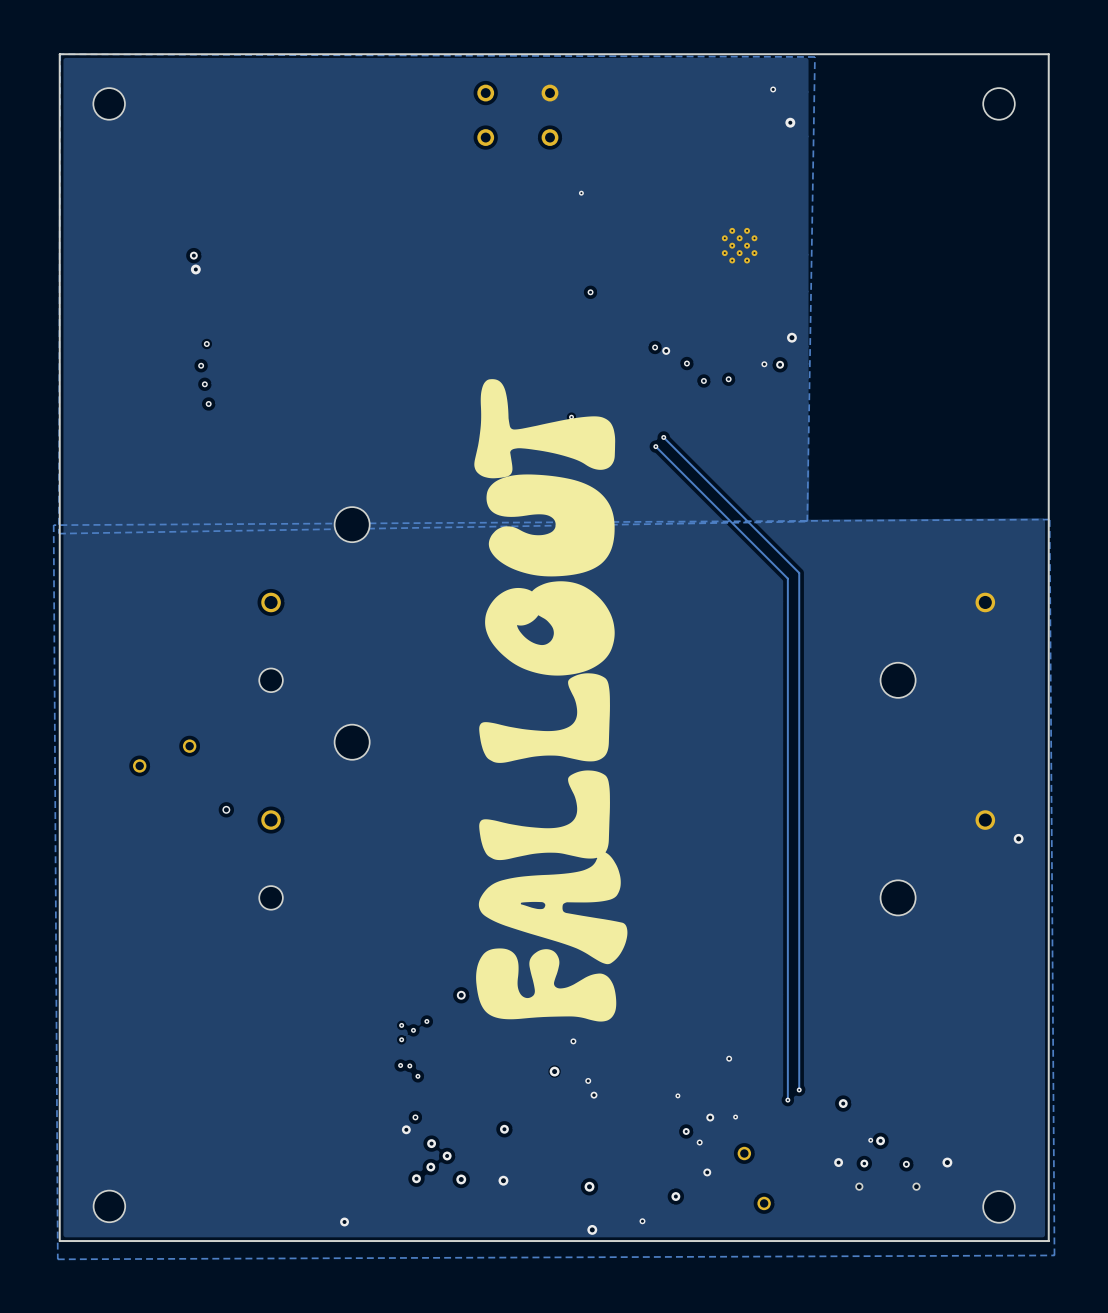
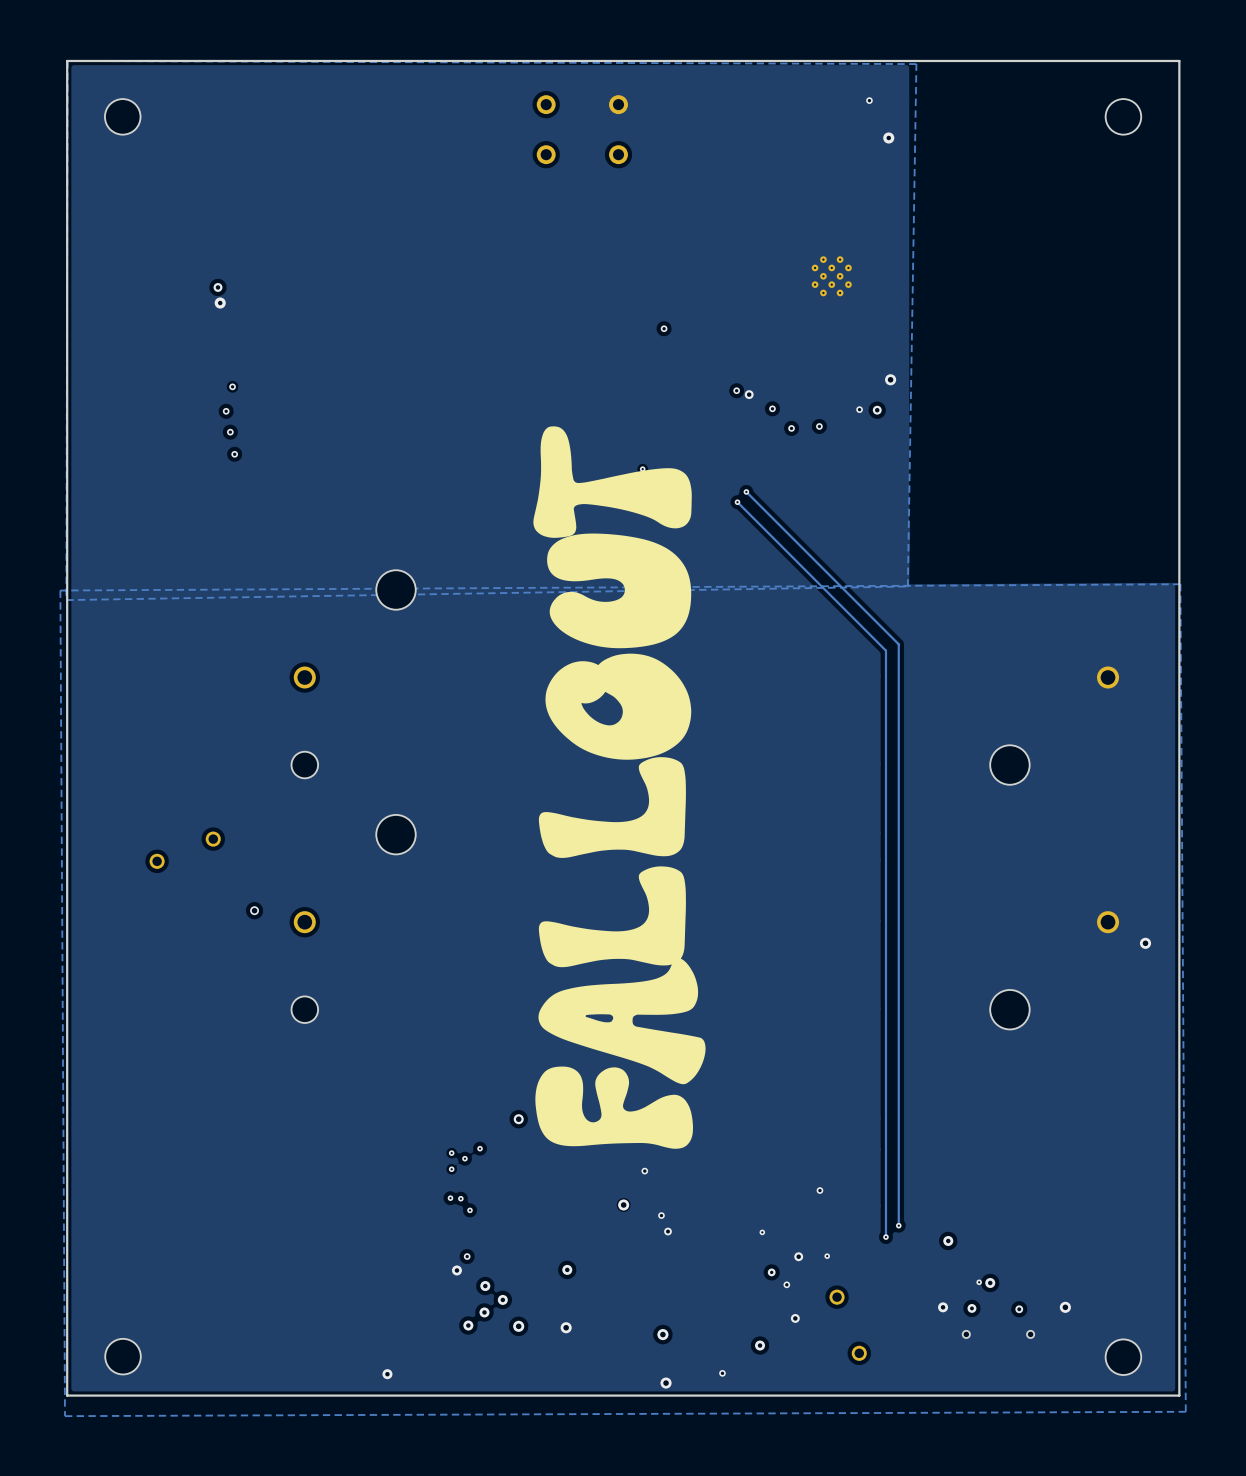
via: (581, 193) -> none

